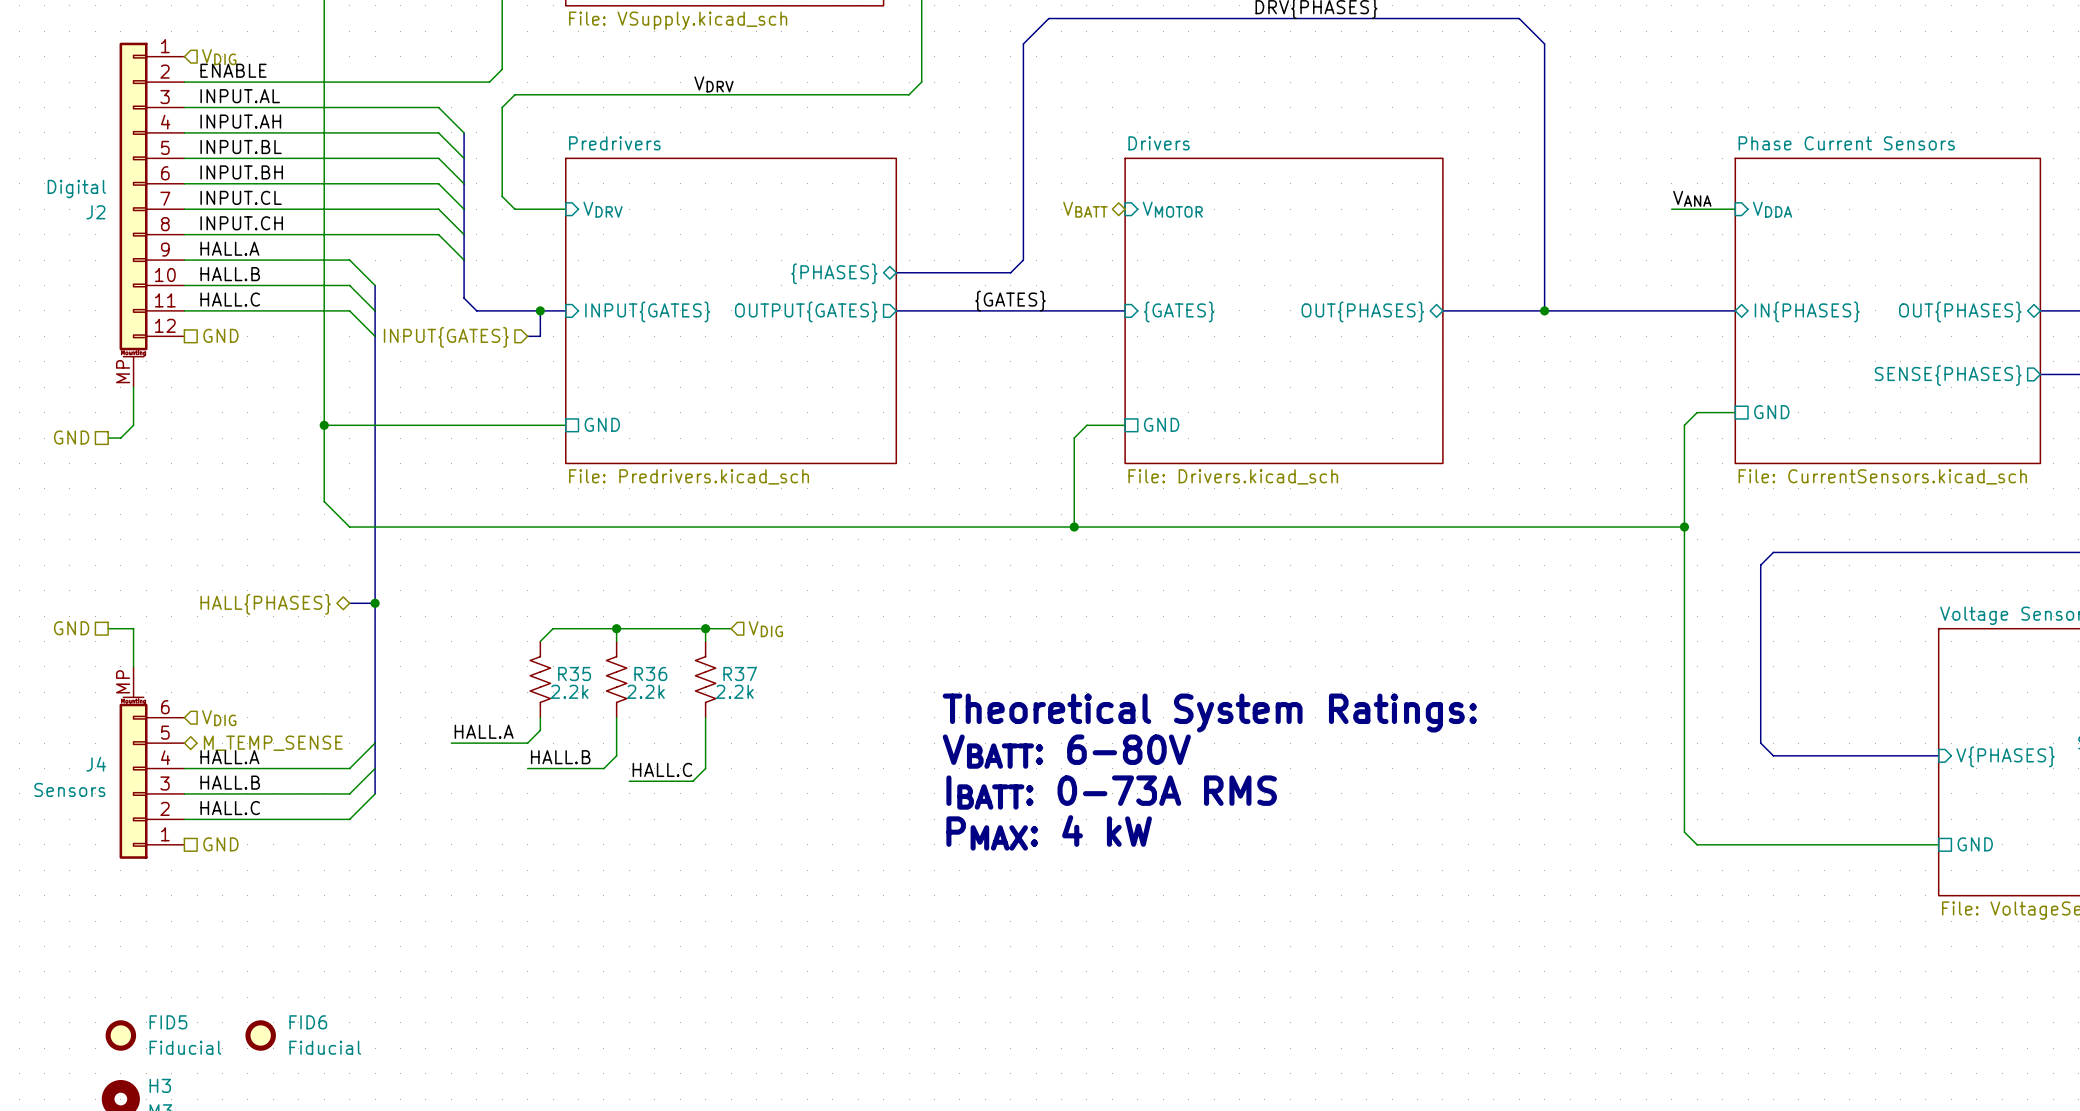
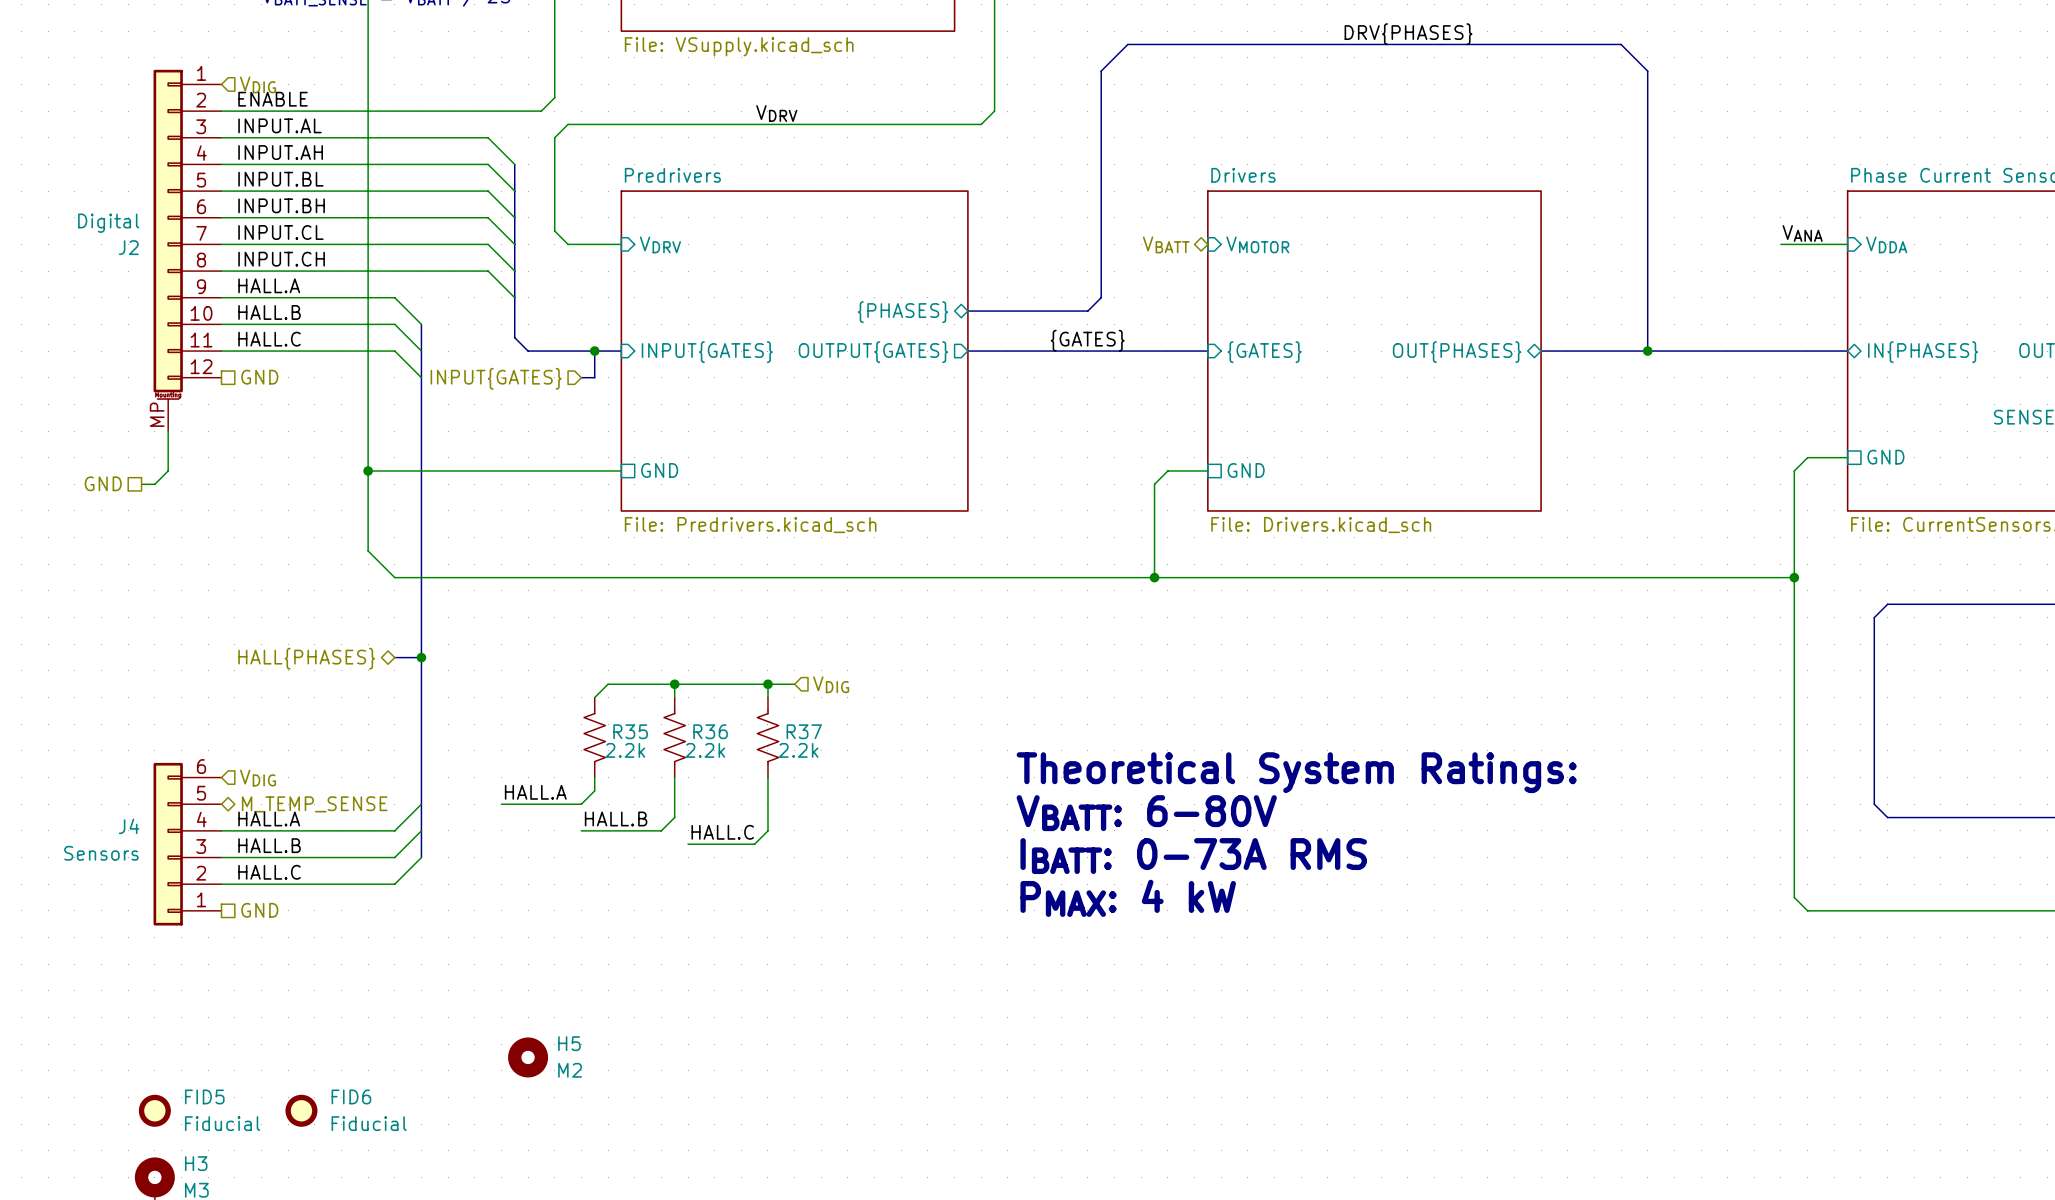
hierarchical label: GND (71, 628) -> none
wire: (108, 628) (133, 628) (133, 666) -> none
J4 symbol: [119, 666, 185, 859] -> [153, 762, 222, 926]
H5: none -> M2 (528, 1057)

